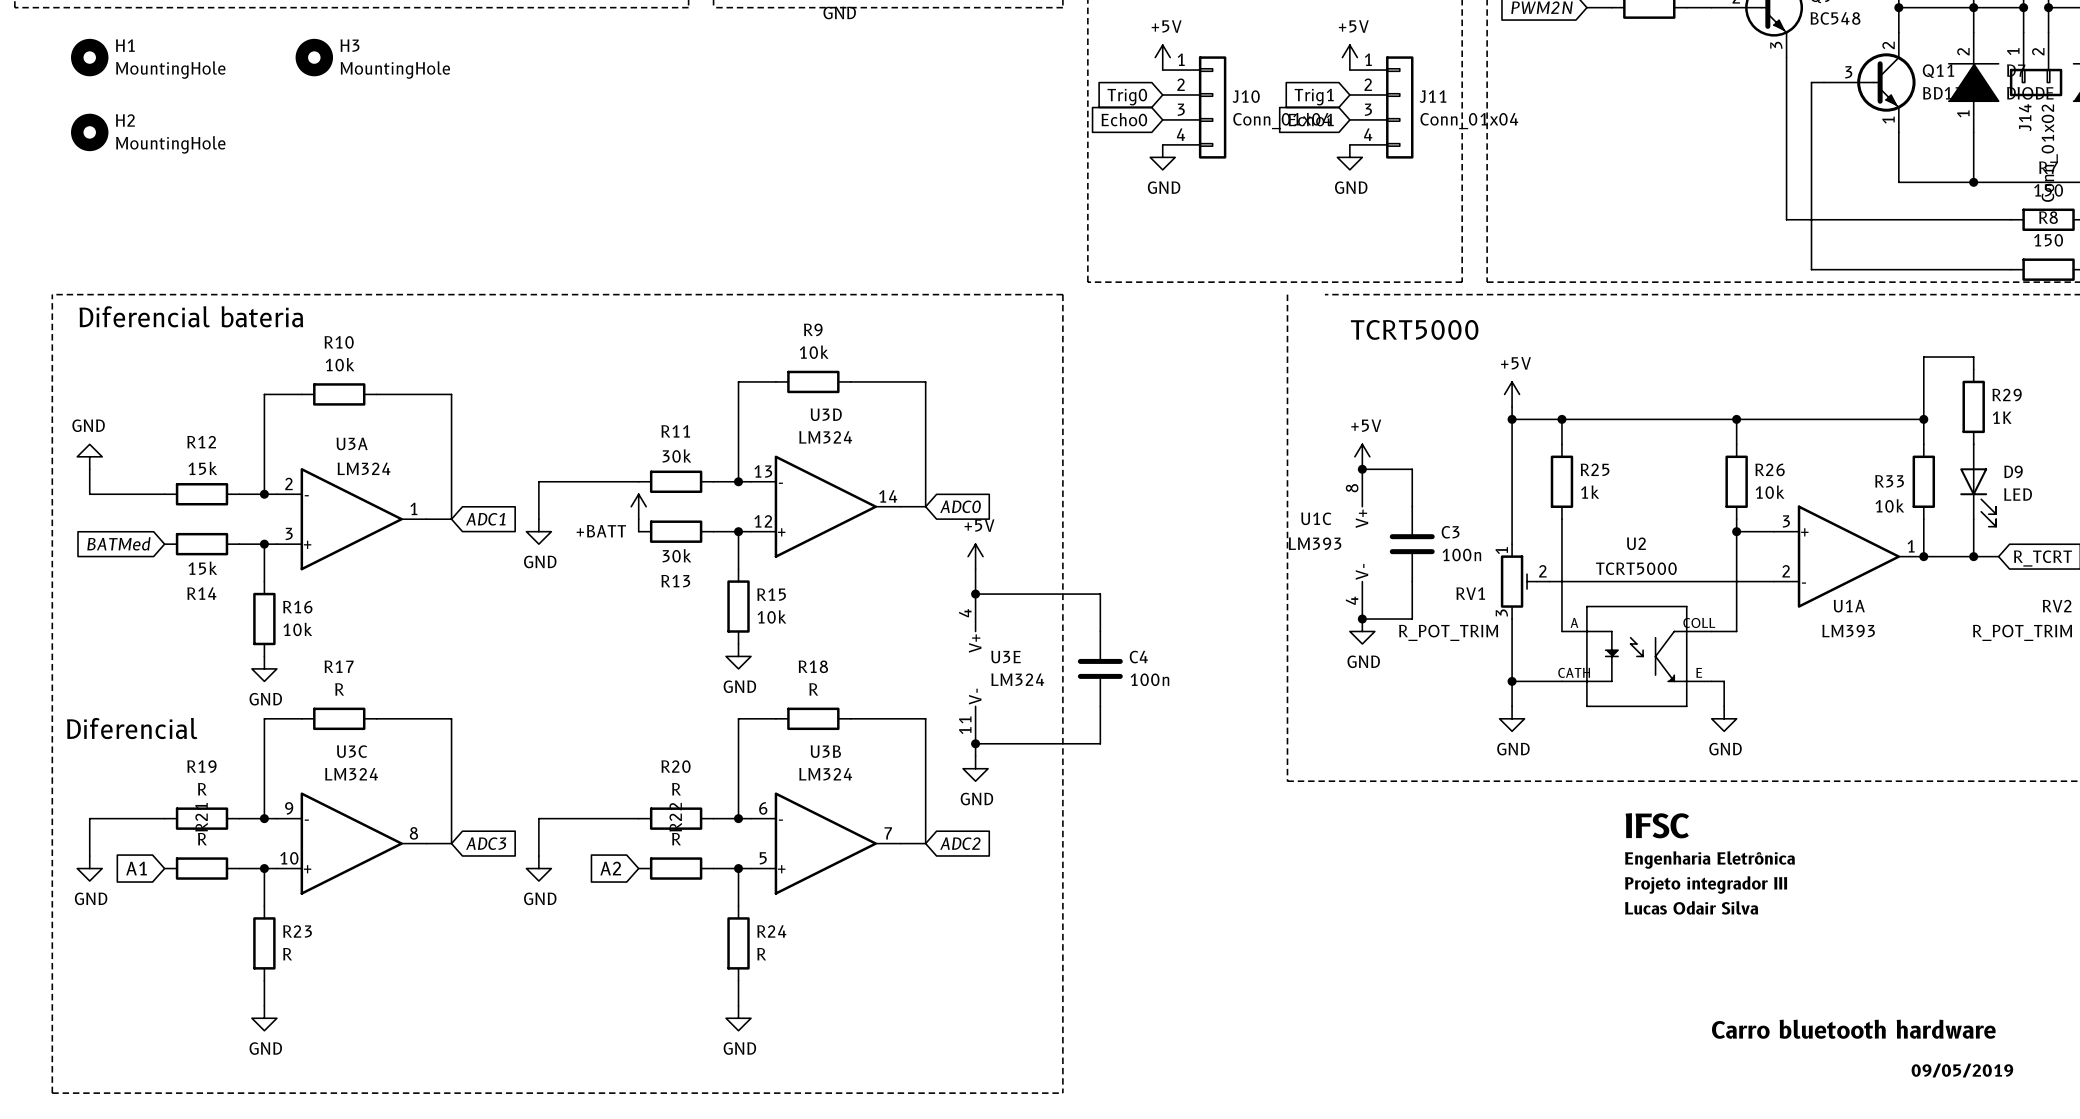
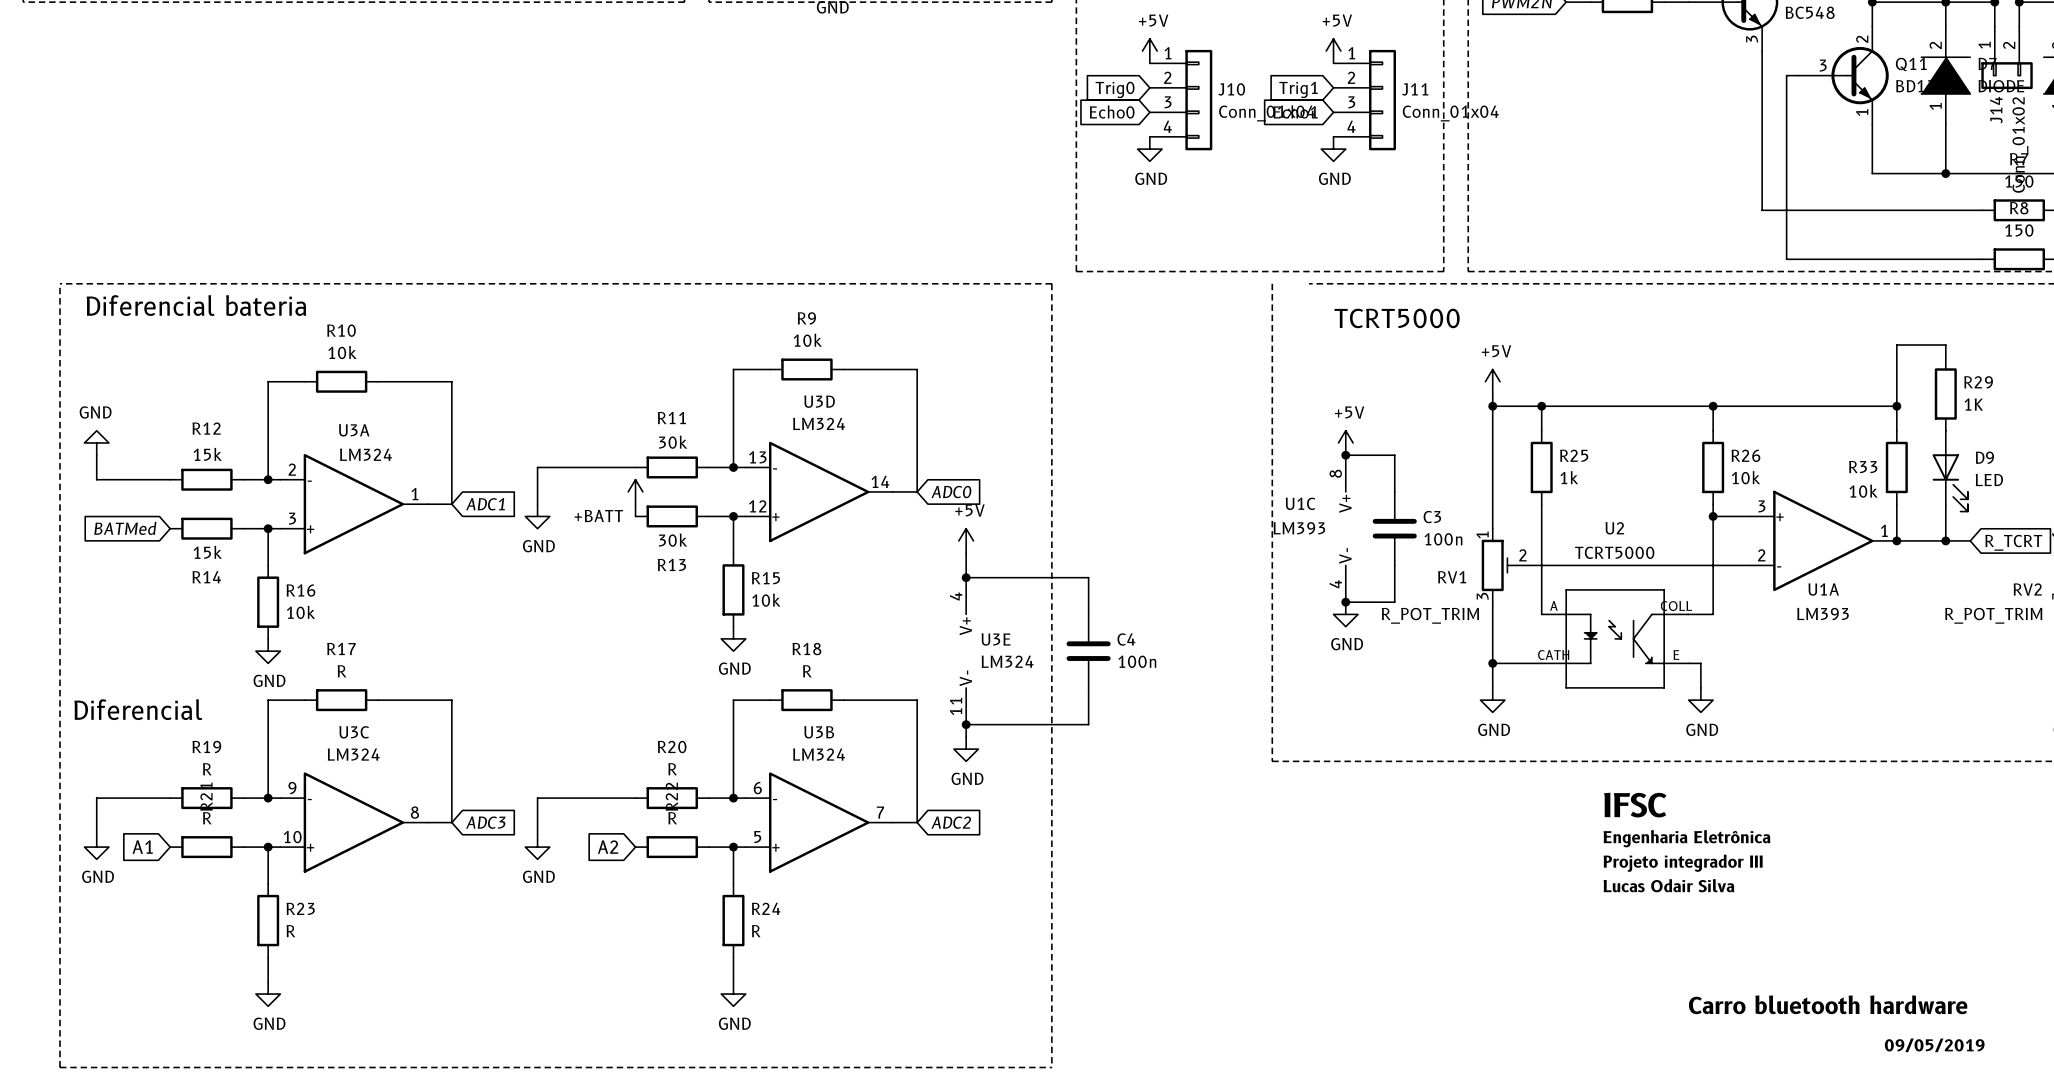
H1: MountingHole (89, 57) -> none
H3: MountingHole (314, 57) -> none
H2: MountingHole (89, 132) -> none

